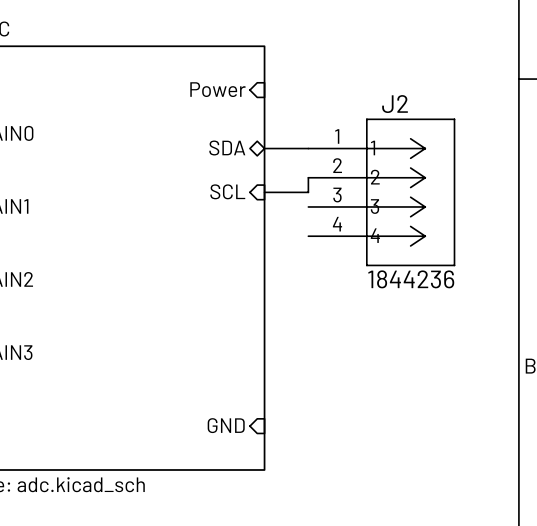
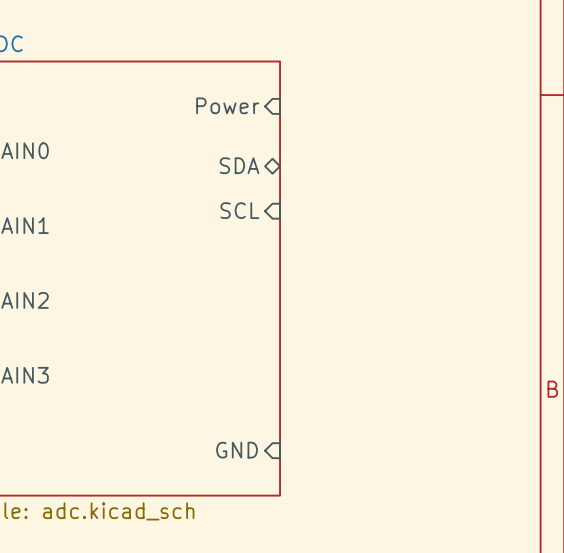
wire: (264, 148) (308, 148) -> none
wire: (308, 177) (308, 192) (264, 192) -> none
J2: 1844236 (381, 192) -> none

